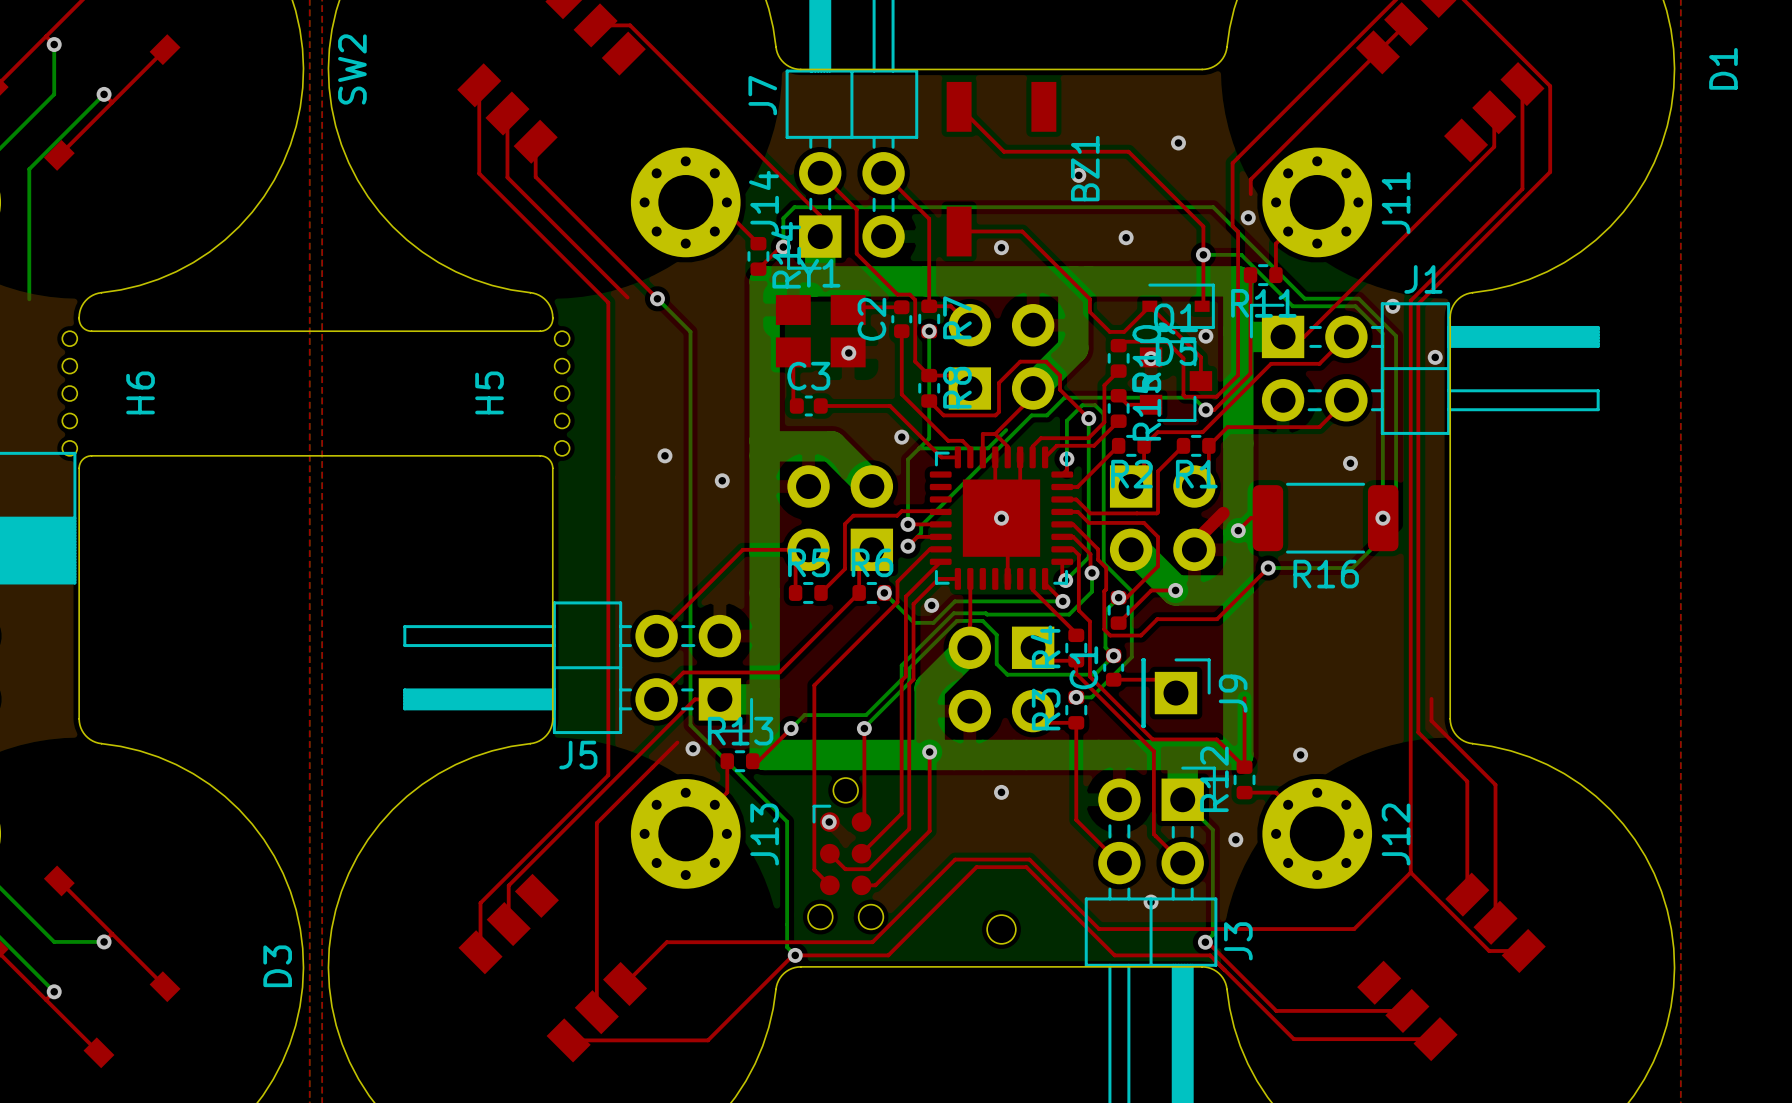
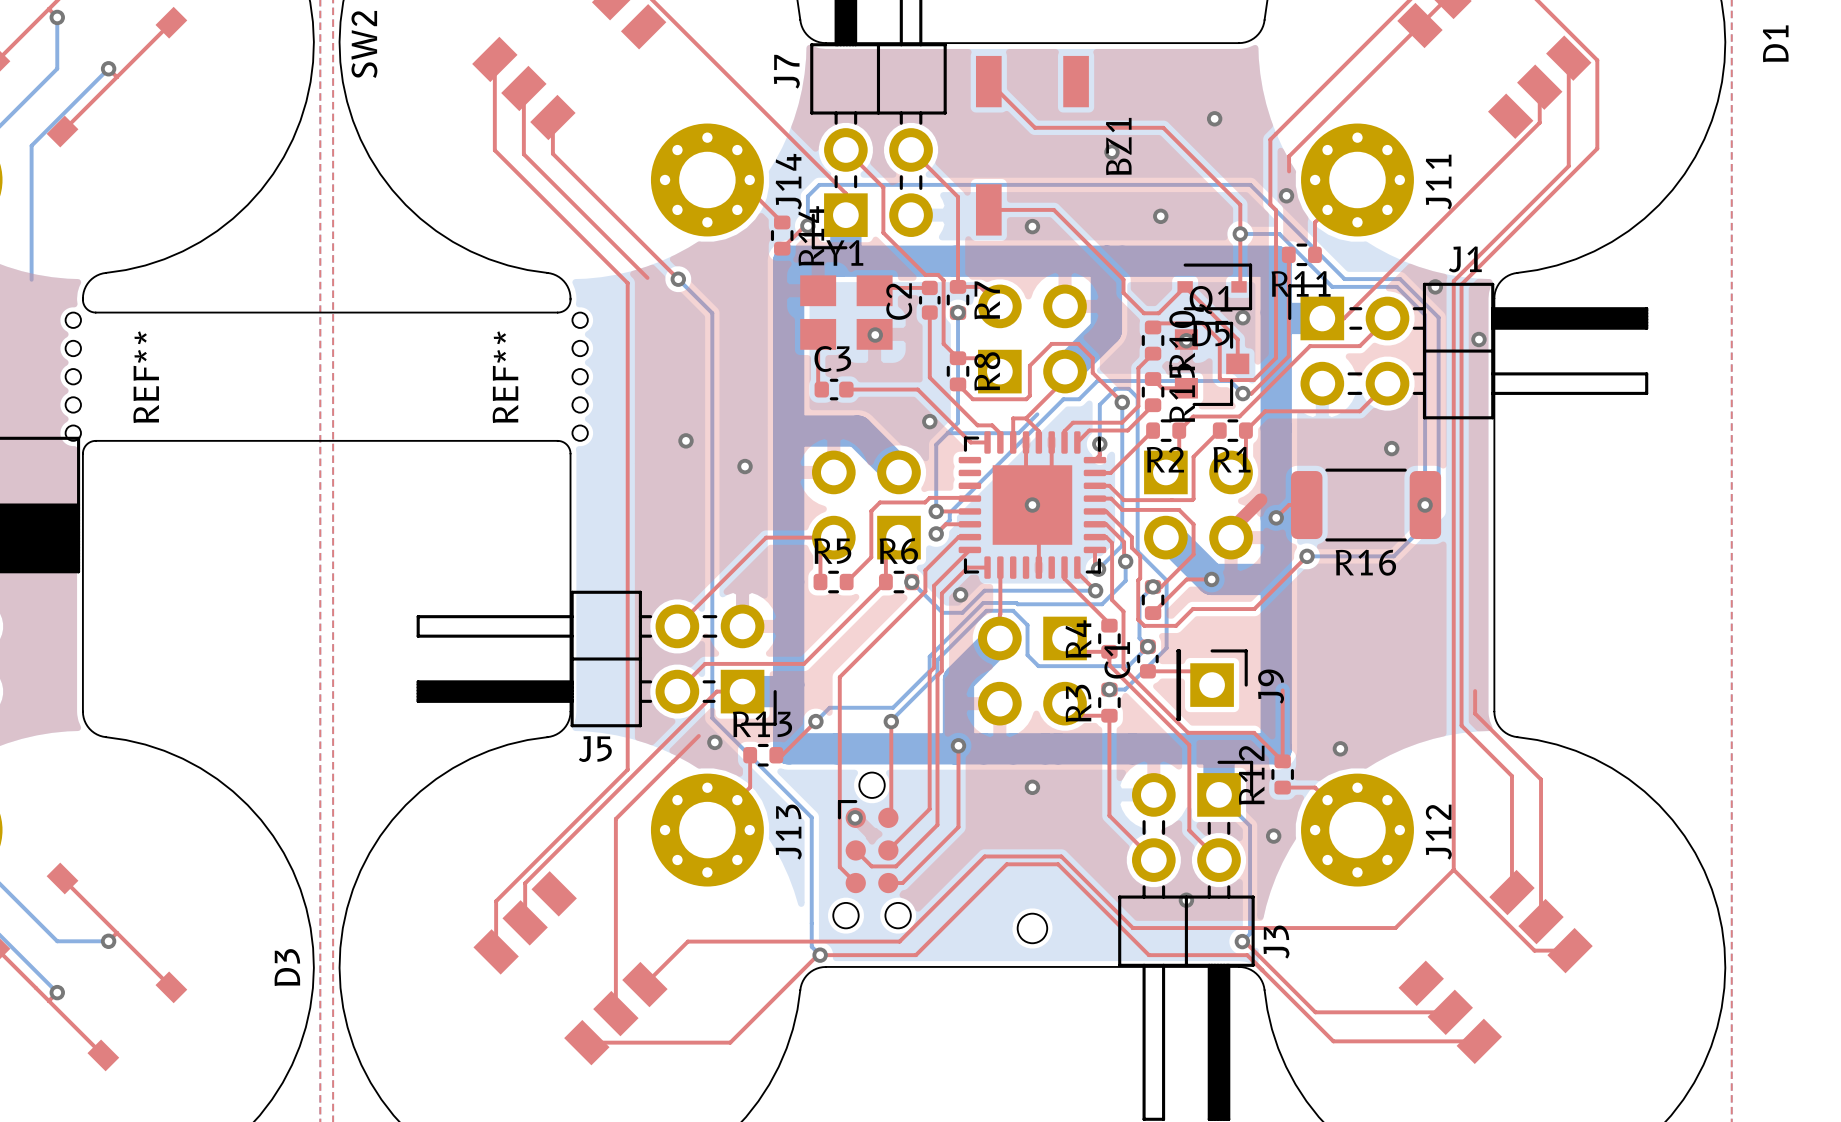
H6 name: H6 (140, 392) -> REF** (146, 377)
H5 name: H5 (489, 392) -> REF** (505, 377)

